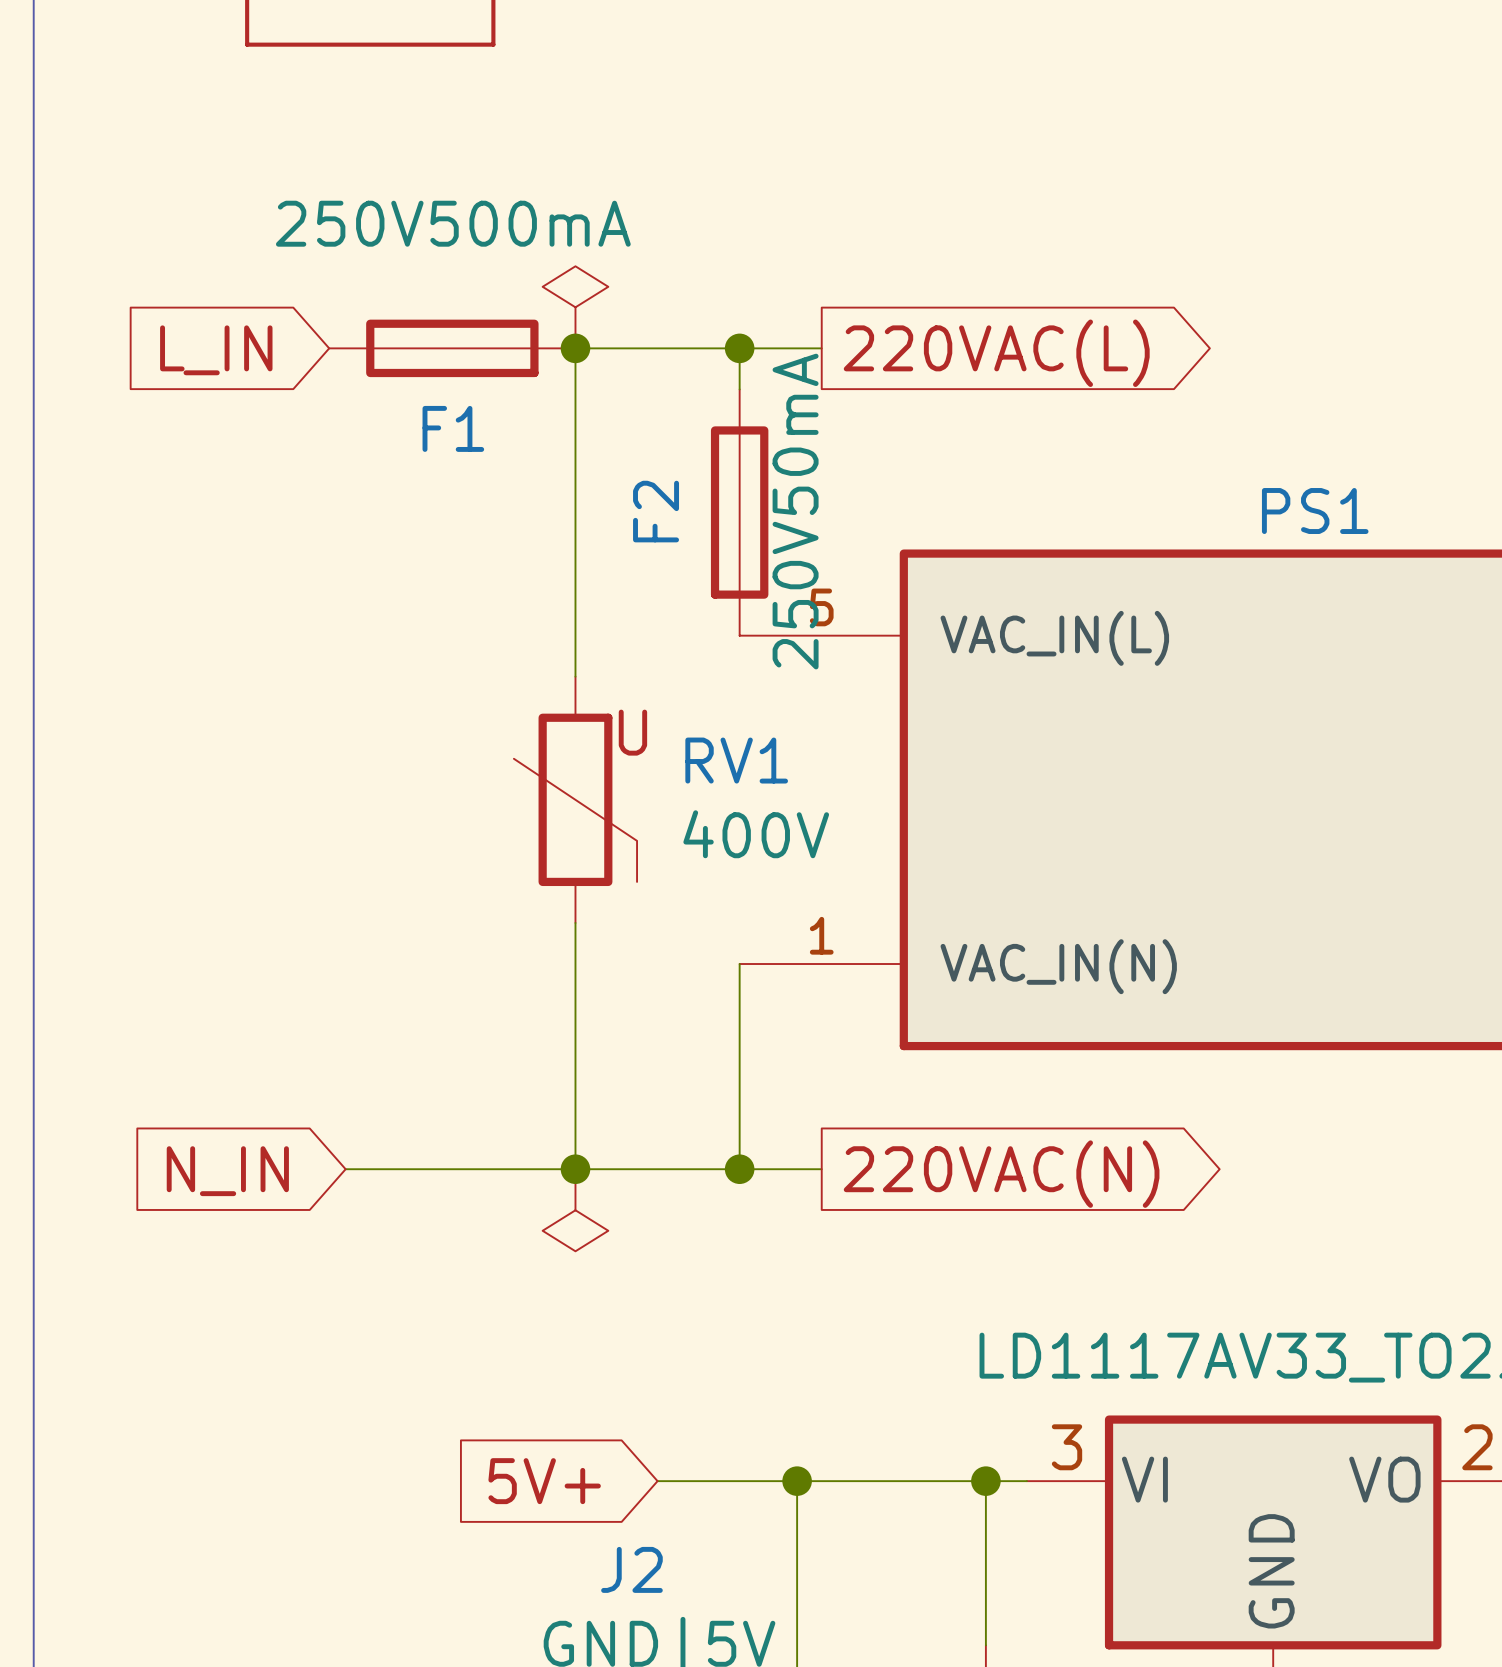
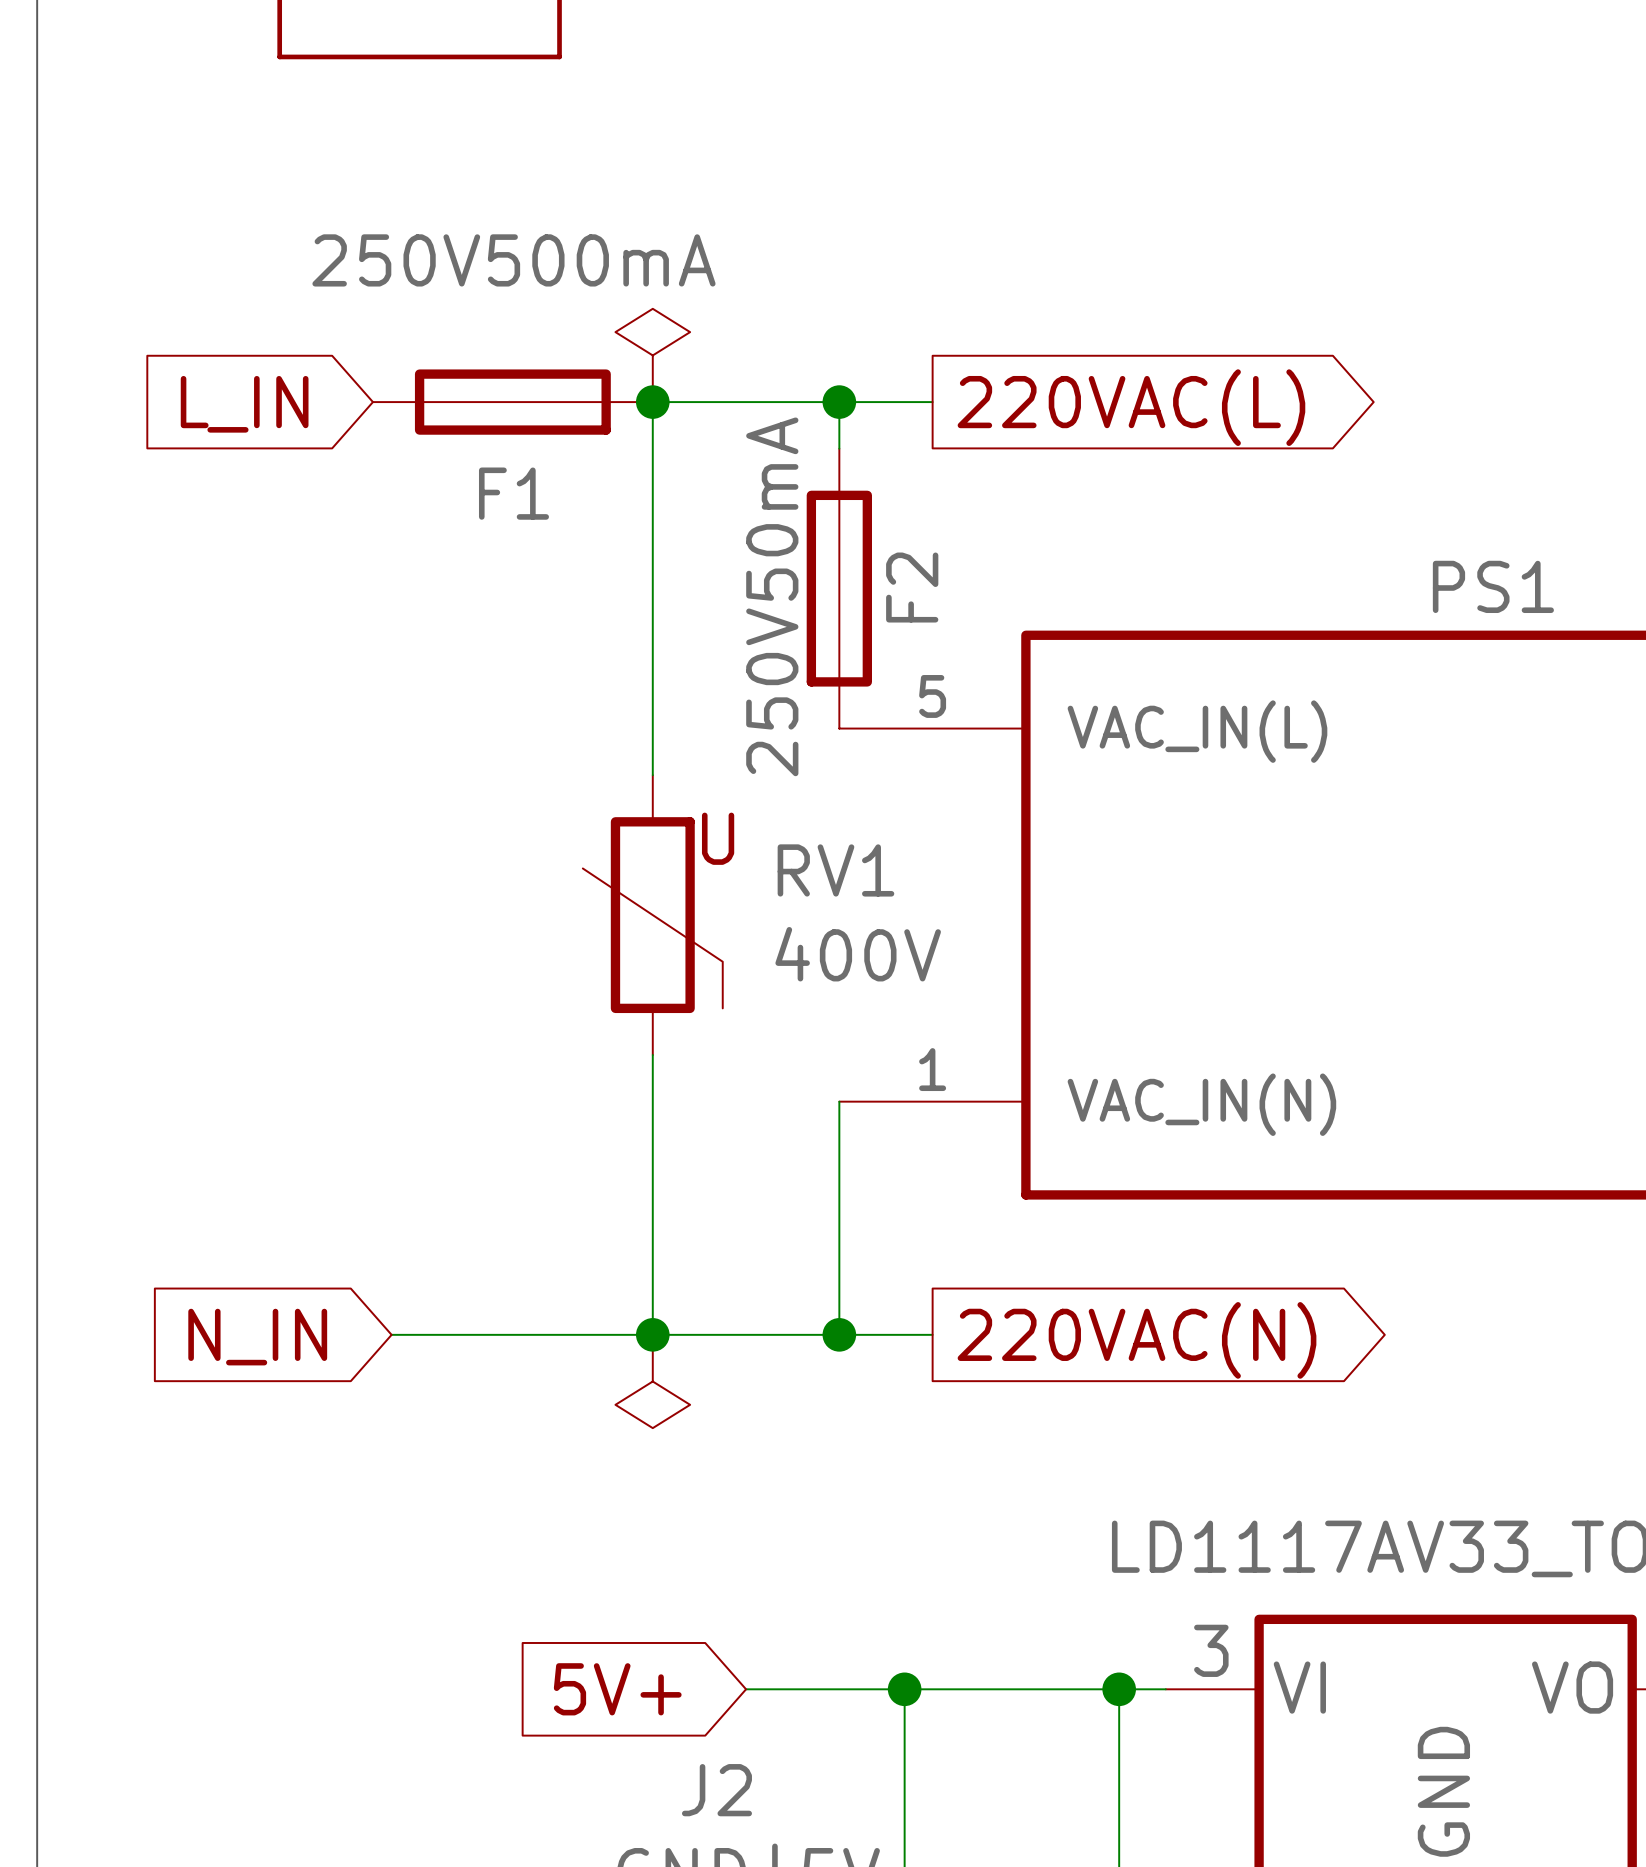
F2 name position: F2 (656, 511) -> F2 (912, 587)
F2 value position: 250V50mA (795, 511) -> 250V50mA (772, 596)

